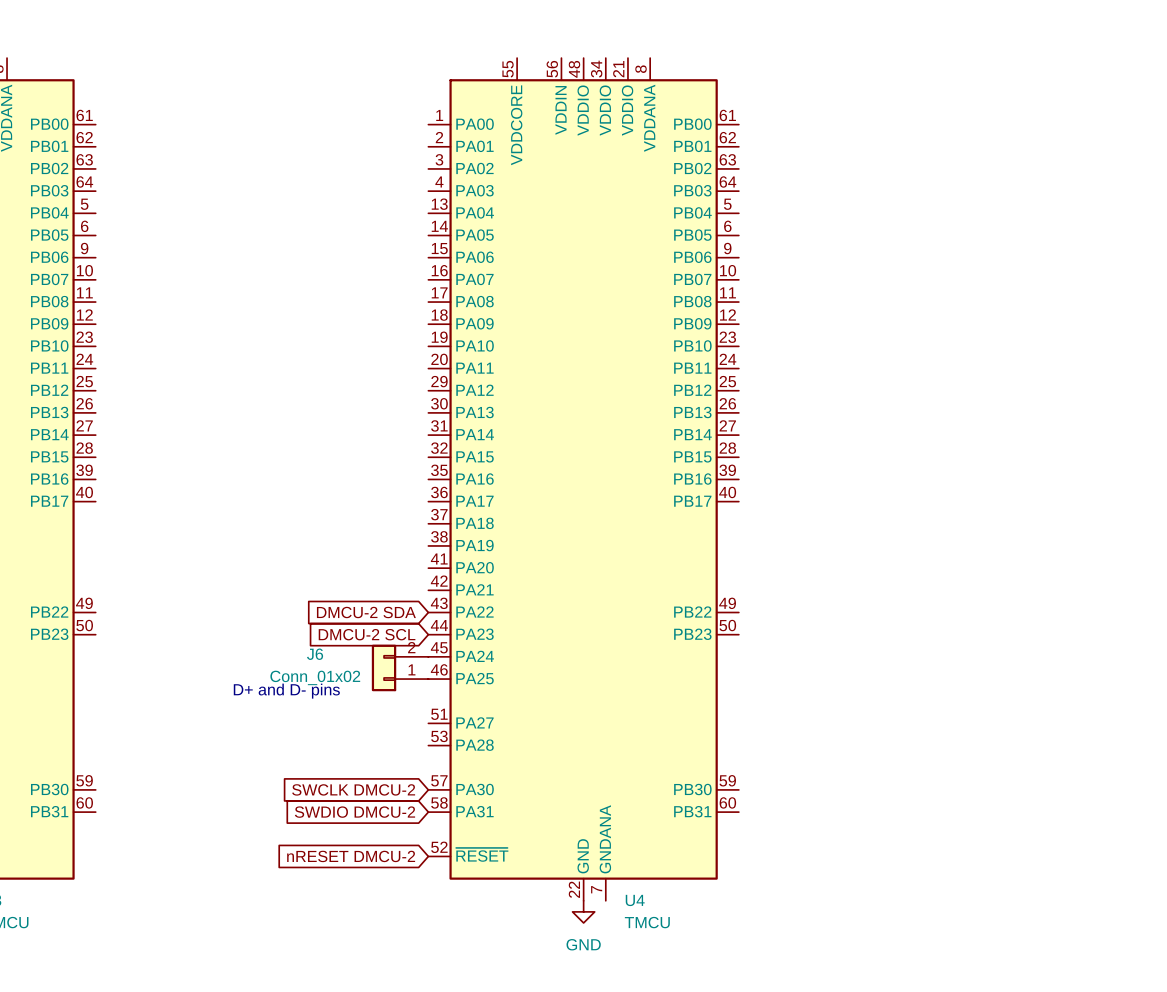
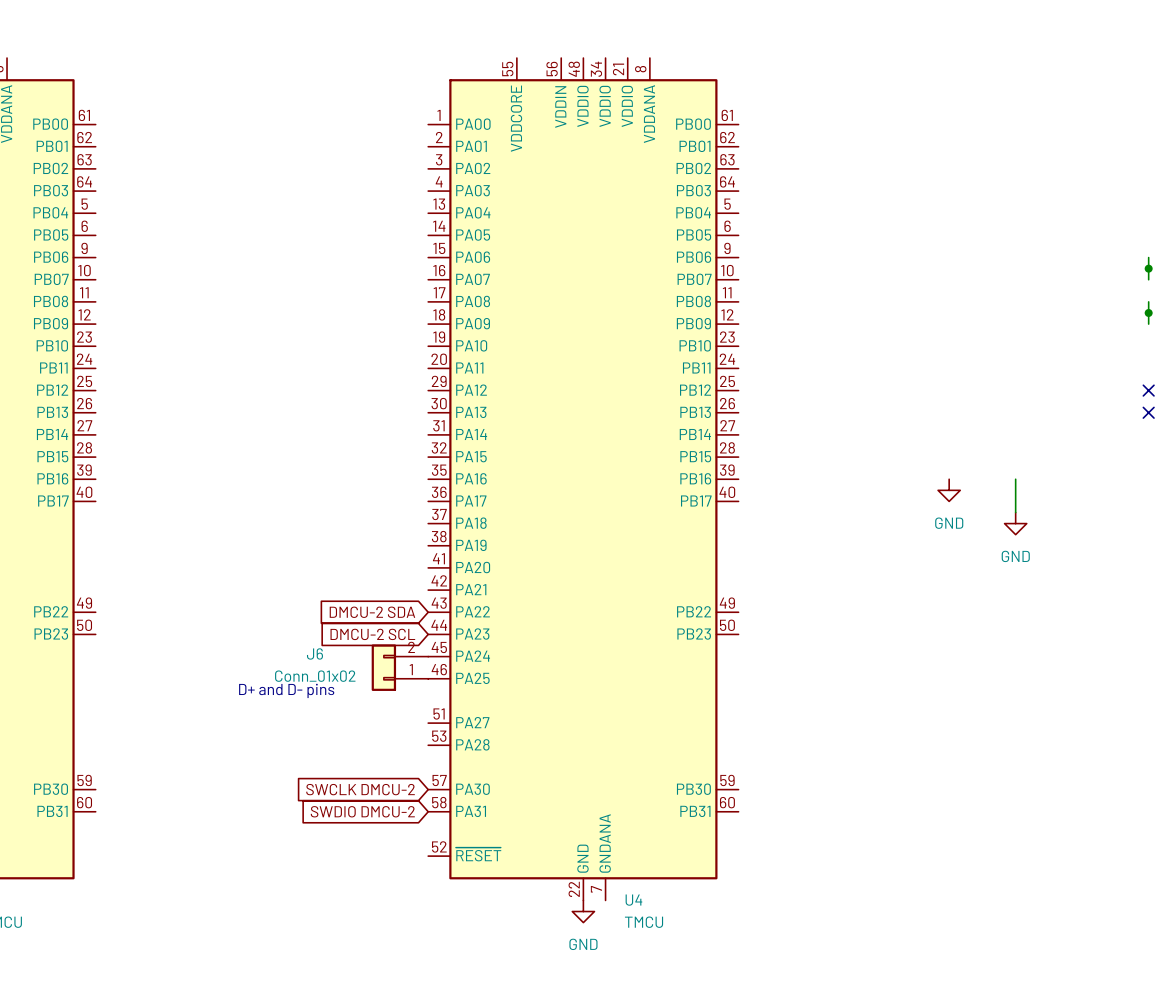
wire: none -> (1148, 257) (1148, 279)
junction: none -> (1148, 268)
wire: none -> (1148, 301) (1148, 324)
junction: none -> (1148, 312)
no-connect mark: none -> (1148, 390)
no-connect mark: none -> (1148, 412)
wire: none -> (1015, 479) (1015, 512)
power symbol: none -> GND (949, 490)
power symbol: none -> GND (1015, 523)
global label: nRESET DMCU-2 (351, 856) -> none

